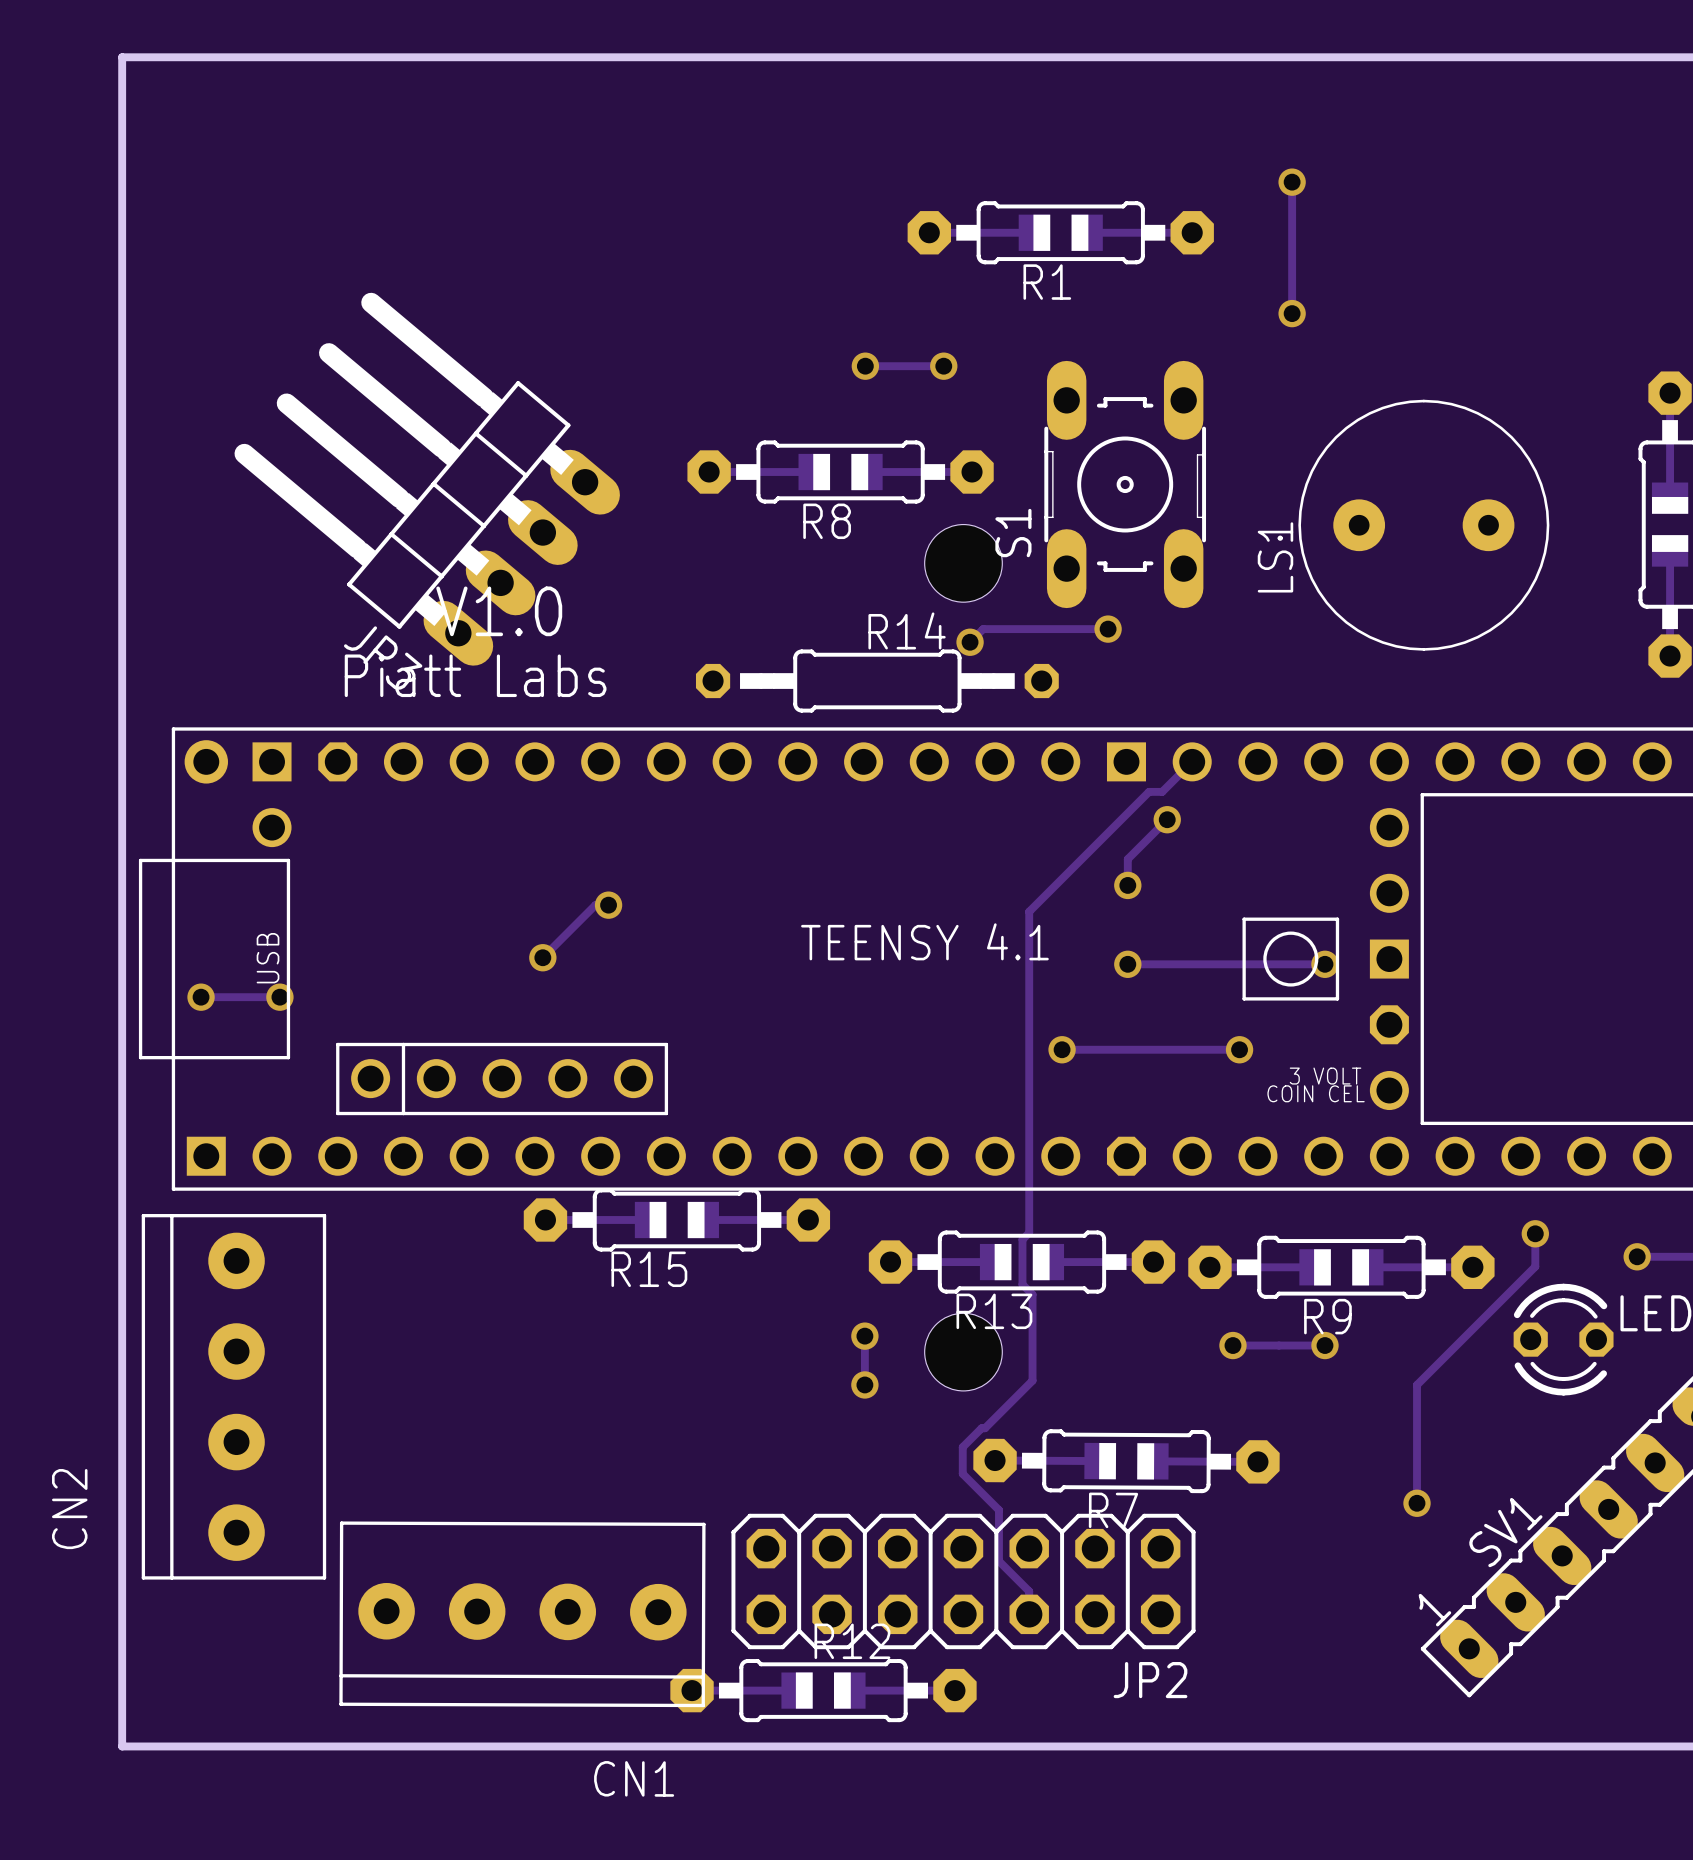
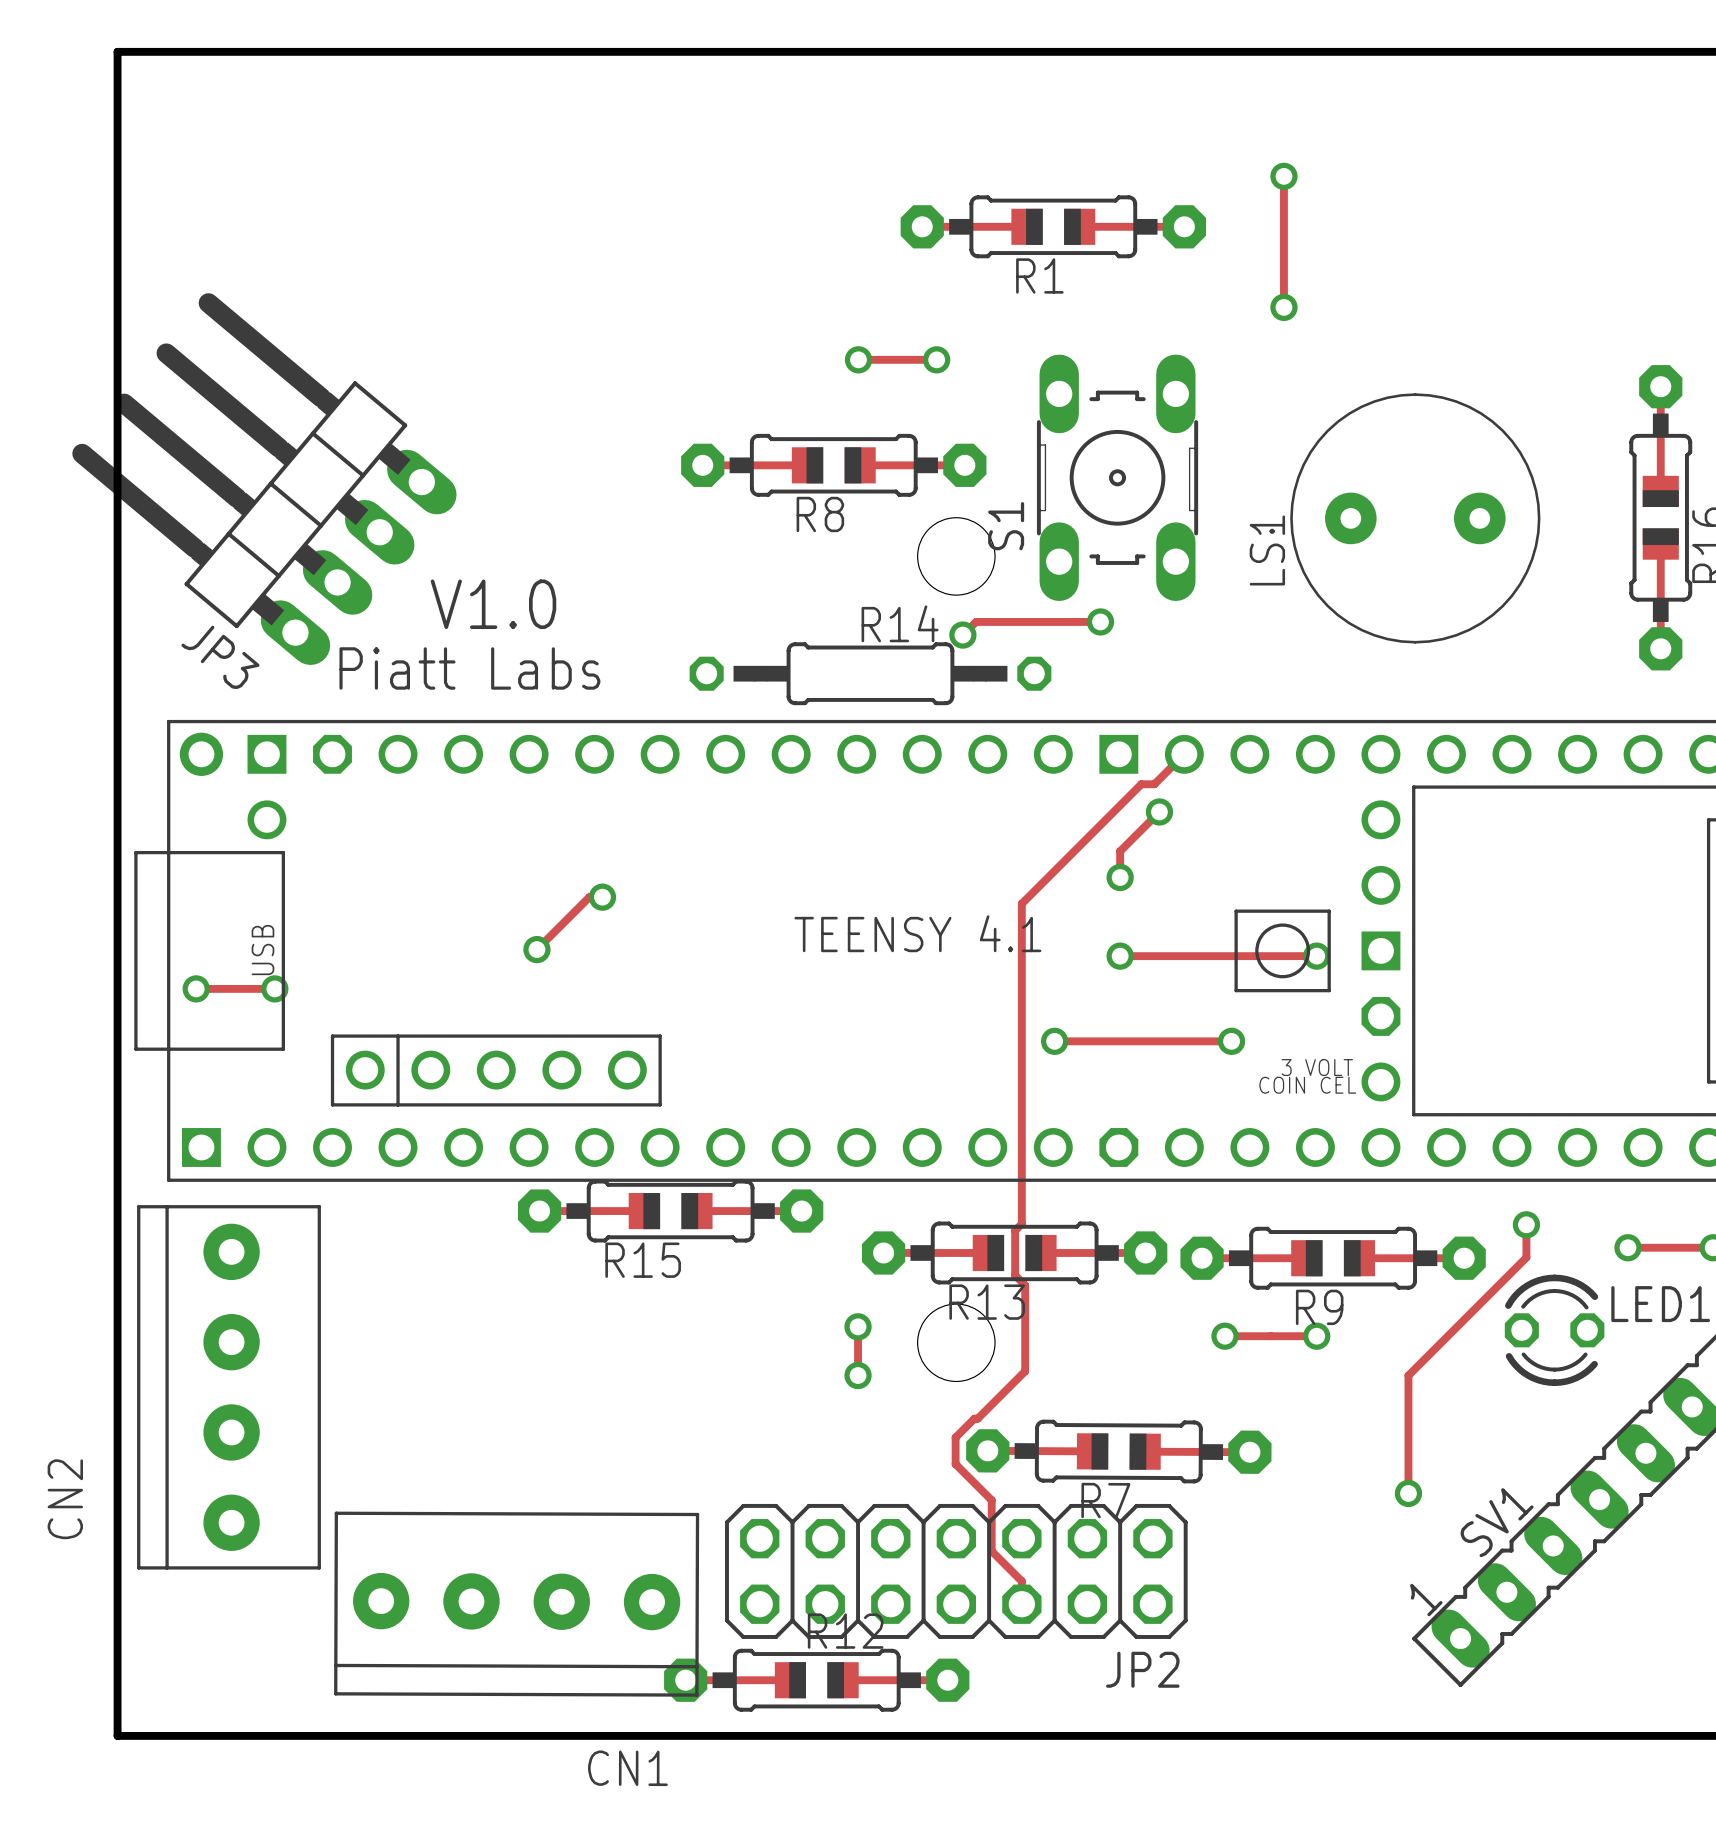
JP3 footprint: [234, 292, 620, 666] -> [72, 293, 457, 665]

